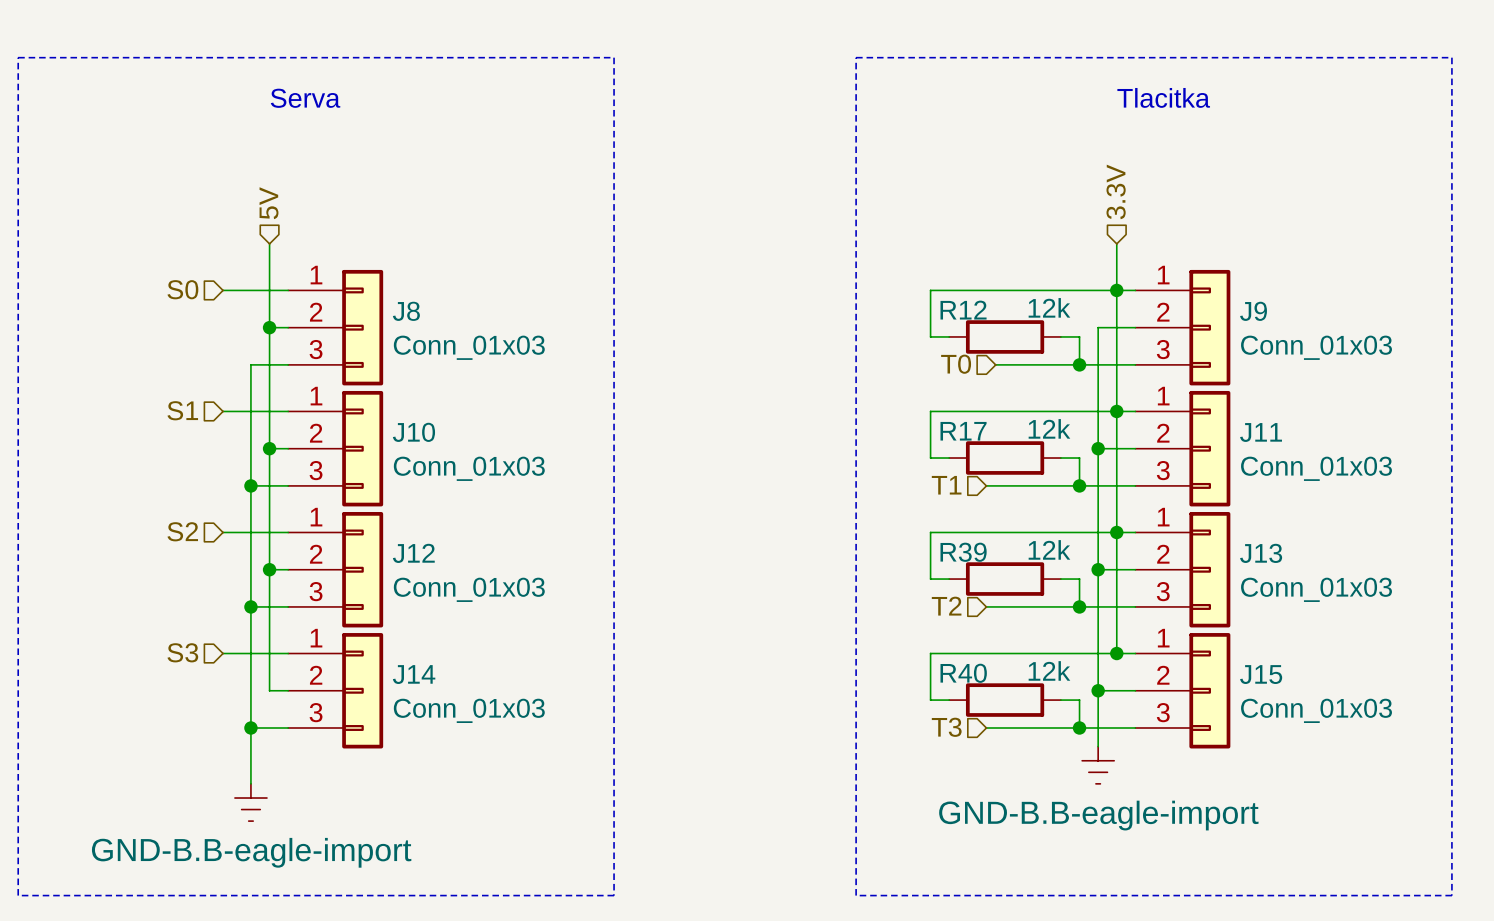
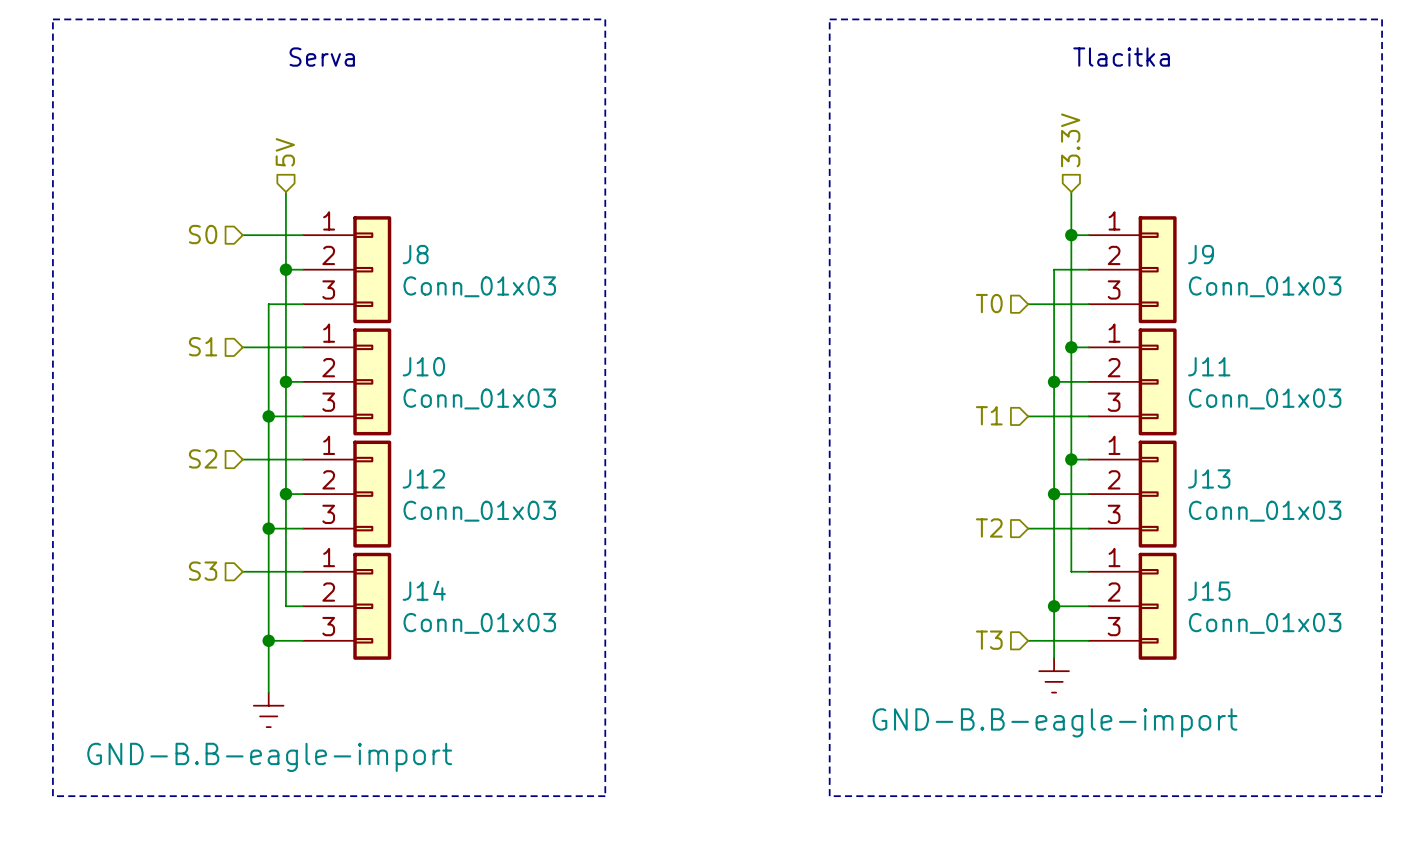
wire: (1116, 290) (930, 290) (930, 336) (949, 336) -> none
R12: 12k (1005, 336) -> none
wire: (1060, 336) (1079, 336) (1079, 364) -> none
hierarchical label position: T0 (956, 364) -> T0 (989, 303)
wire: (995, 364) (1070, 364) -> none
junction: (1079, 364) -> none
wire: (1116, 411) (930, 411) (930, 458) (949, 458) -> none
R17: 12k (1005, 458) -> none
wire: (1060, 458) (1079, 458) (1079, 485) -> none
hierarchical label position: T1 (946, 485) -> T1 (989, 415)
wire: (986, 485) (1070, 485) -> none
junction: (1079, 485) -> none
wire: (1116, 532) (930, 532) (930, 579) (949, 579) -> none
R39: 12k (1005, 579) -> none
wire: (1060, 579) (1079, 579) (1079, 606) -> none
hierarchical label position: T2 (946, 606) -> T2 (989, 527)
wire: (986, 606) (1070, 606) -> none
junction: (1079, 606) -> none
wire: (1116, 653) (930, 653) (930, 700) (949, 700) -> none
junction: (1116, 653) -> none
R40: 12k (1005, 700) -> none
wire: (1060, 700) (1079, 700) (1079, 727) -> none
hierarchical label position: T3 (946, 727) -> T3 (989, 640)
wire: (986, 727) (1070, 727) -> none
junction: (1079, 727) -> none

